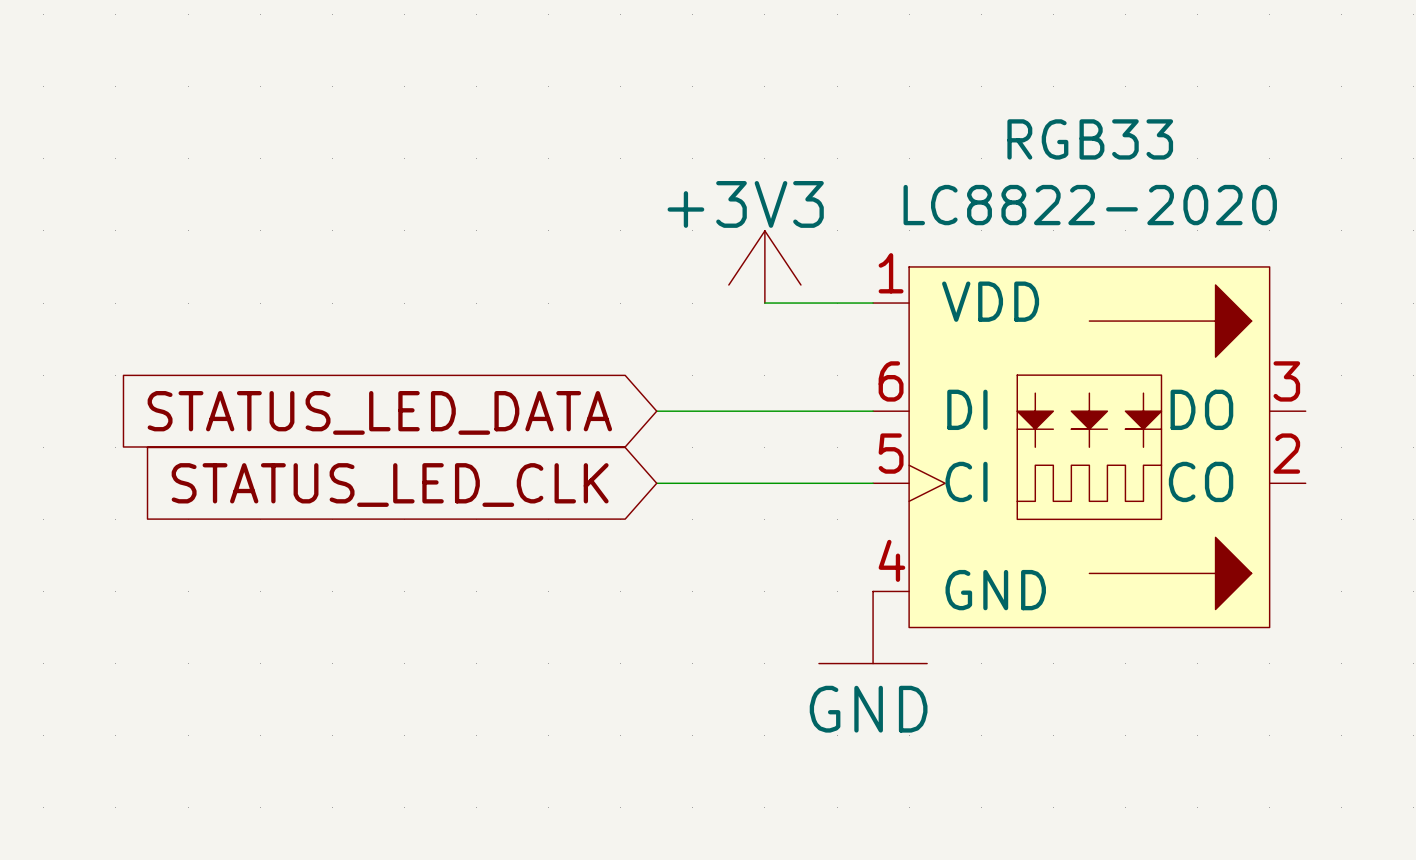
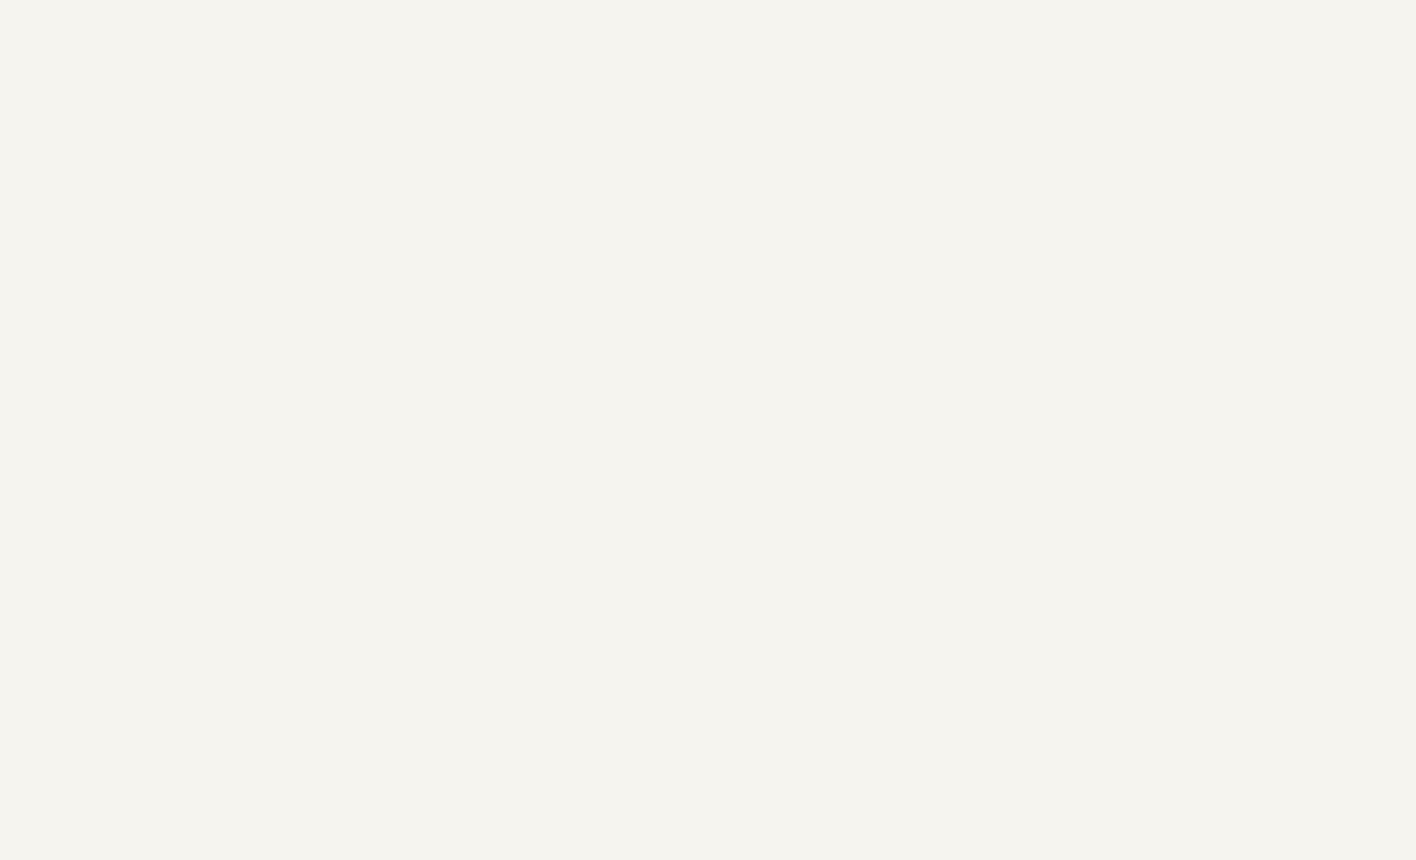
power symbol: +3V3 (764, 266) -> none
wire: (764, 303) (873, 303) -> none
wire: (656, 411) (873, 411) -> none
global label: STATUS_LED_DATA (379, 412) -> none
RGB33: LC8822-2020 (1089, 447) -> none
wire: (656, 483) (873, 483) -> none
global label: STATUS_LED_CLK (390, 485) -> none
power symbol: GND (873, 627) -> none

